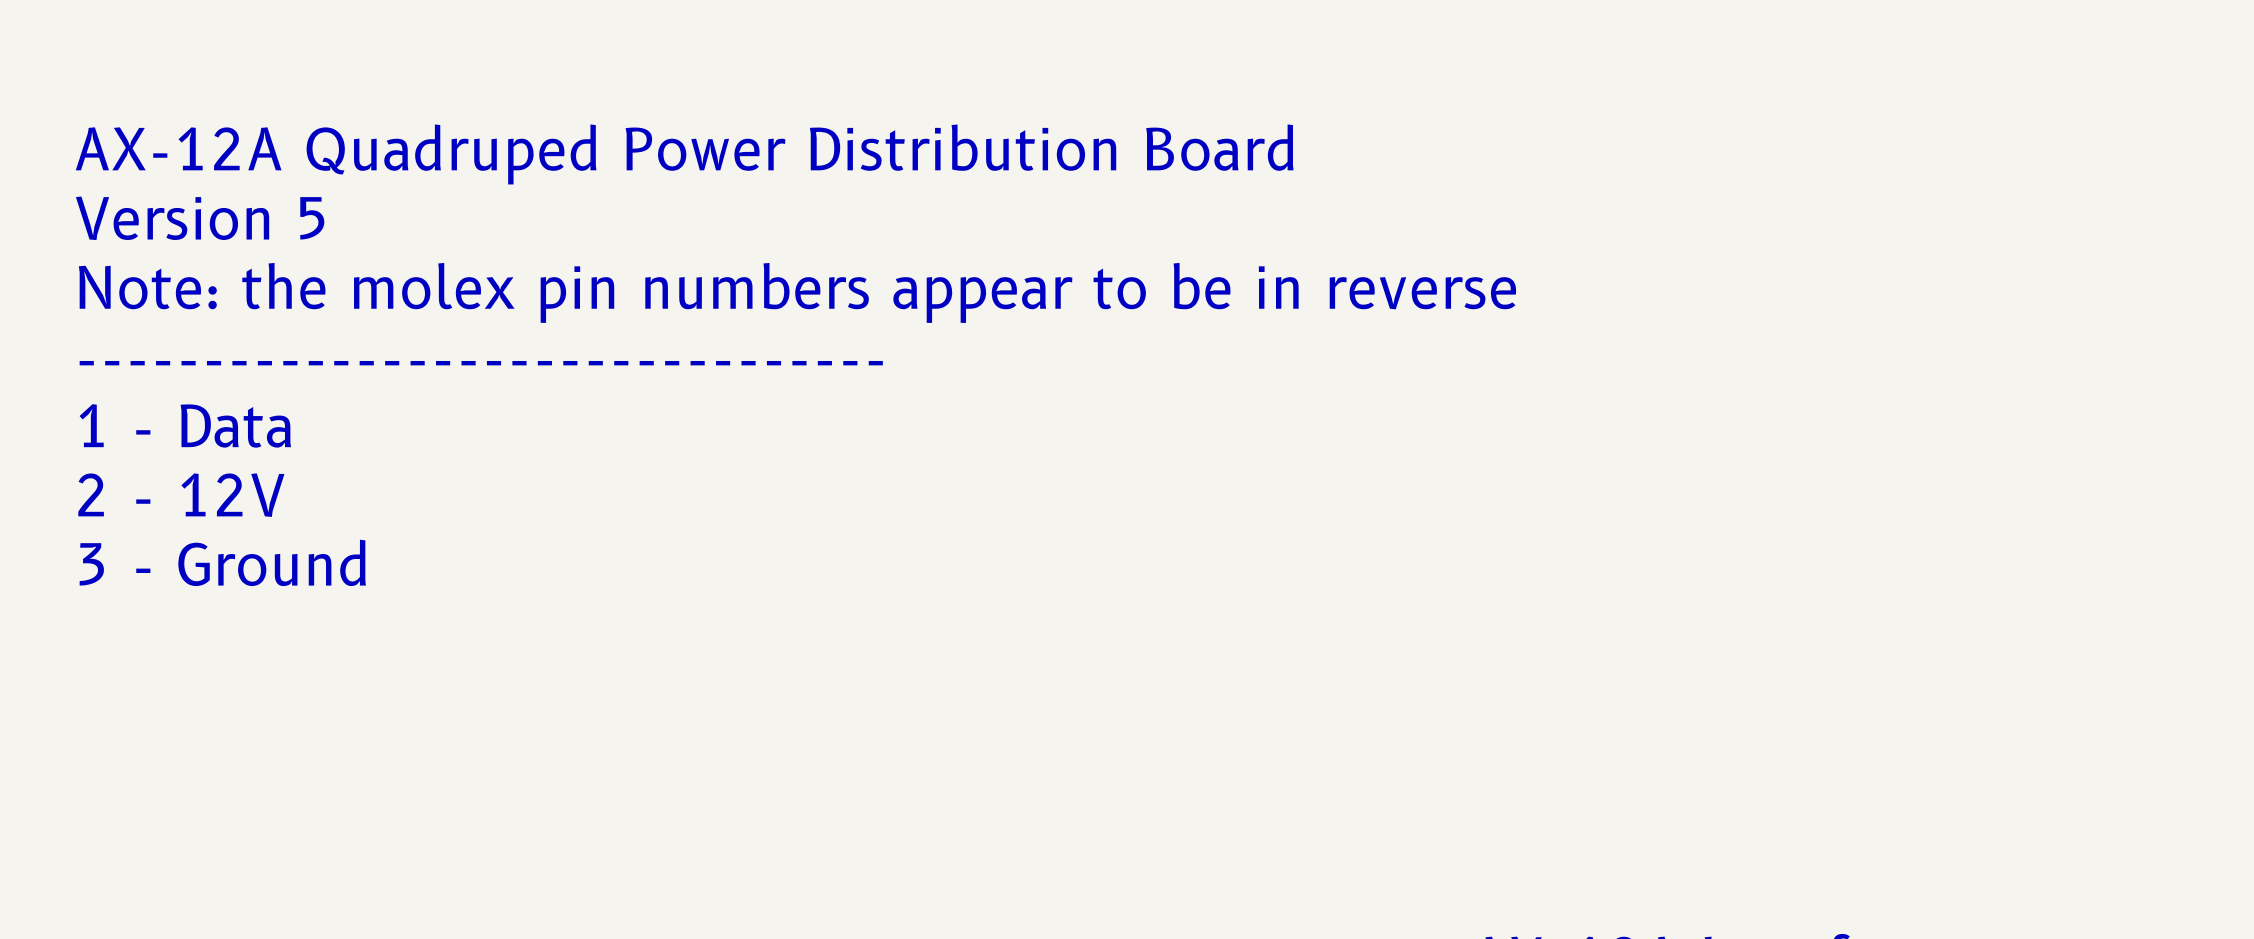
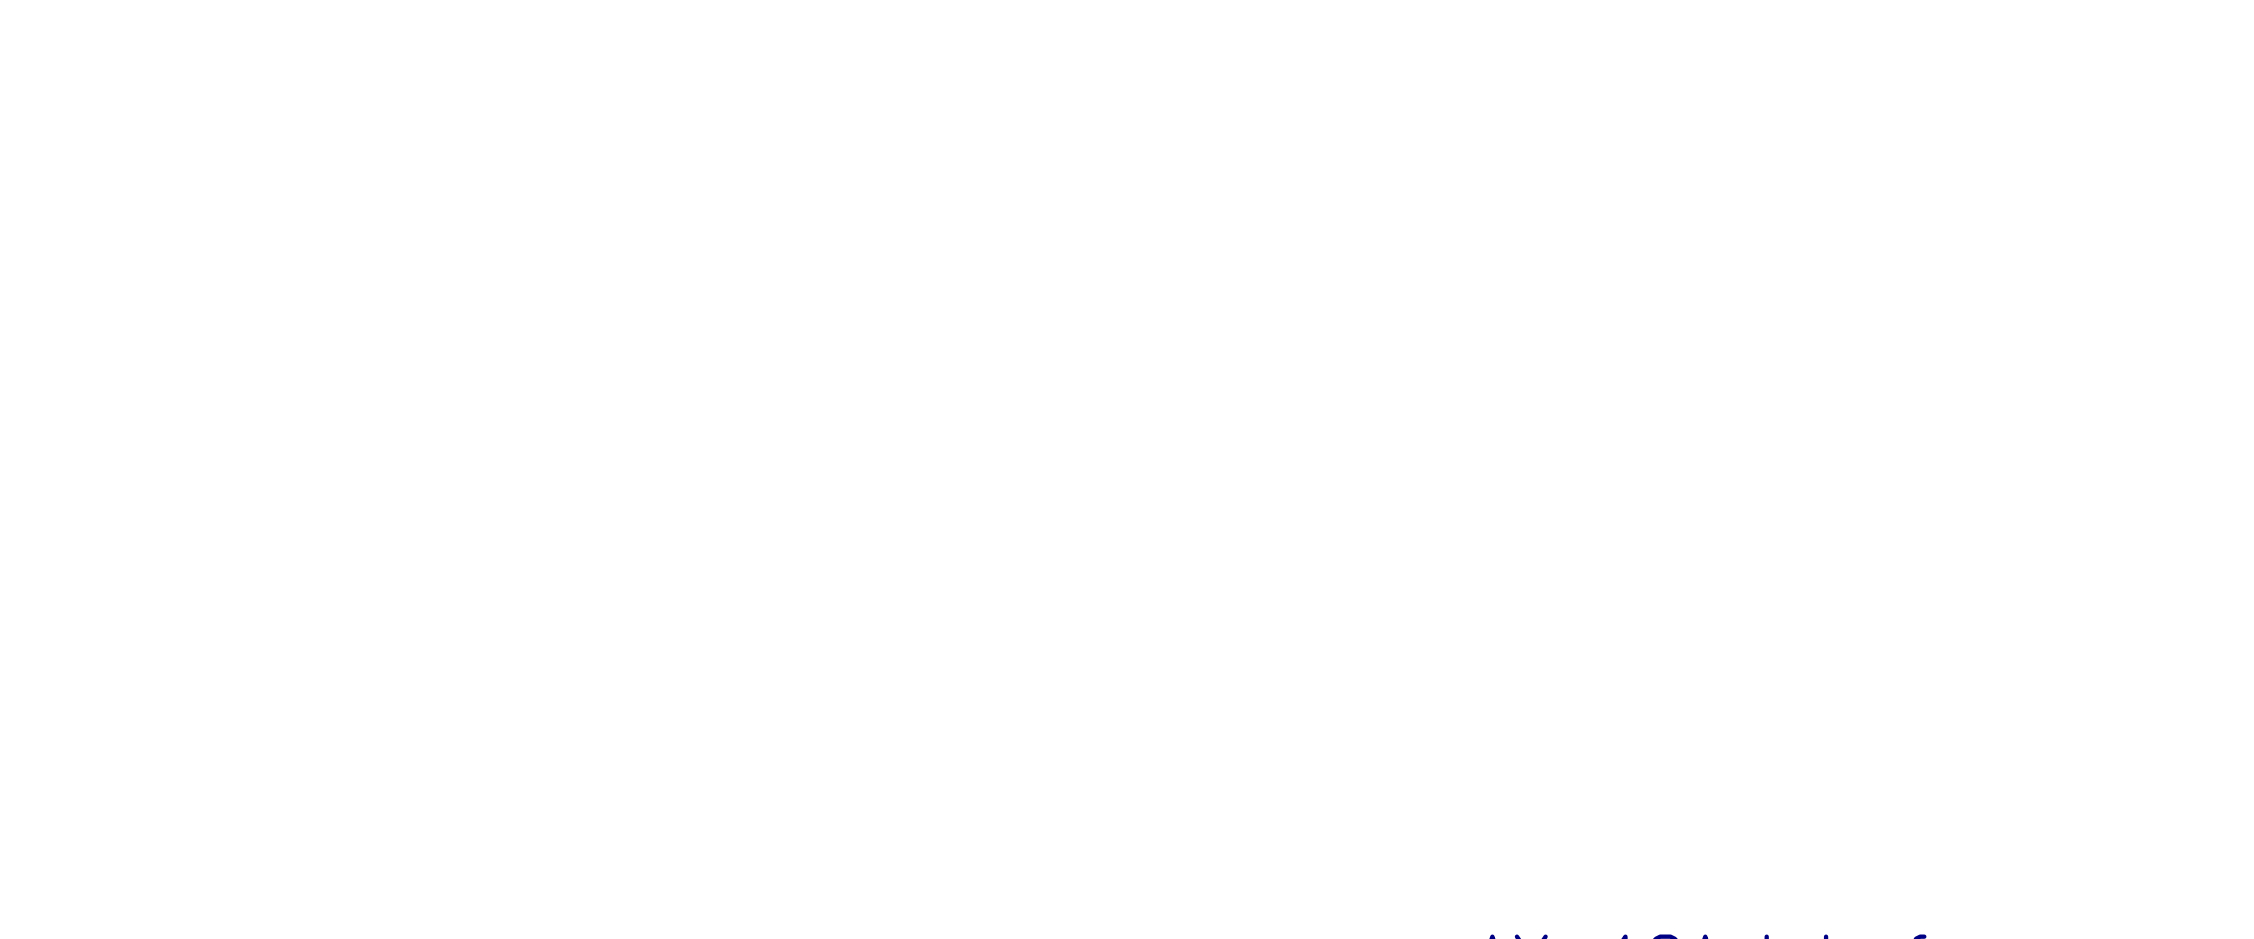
text: AX-12A Quadruped Power Distribution Board (684, 154) -> none
text: Version 5 (200, 218) -> none
text: Note: the molex pin numbers appear to be in reverse (797, 292) -> none
text: -------------------------------- (481, 363) -> none
text: 1 - Data (185, 425) -> none
text: 2 - 12V (181, 495) -> none
text: 3 - Ground (222, 562) -> none

